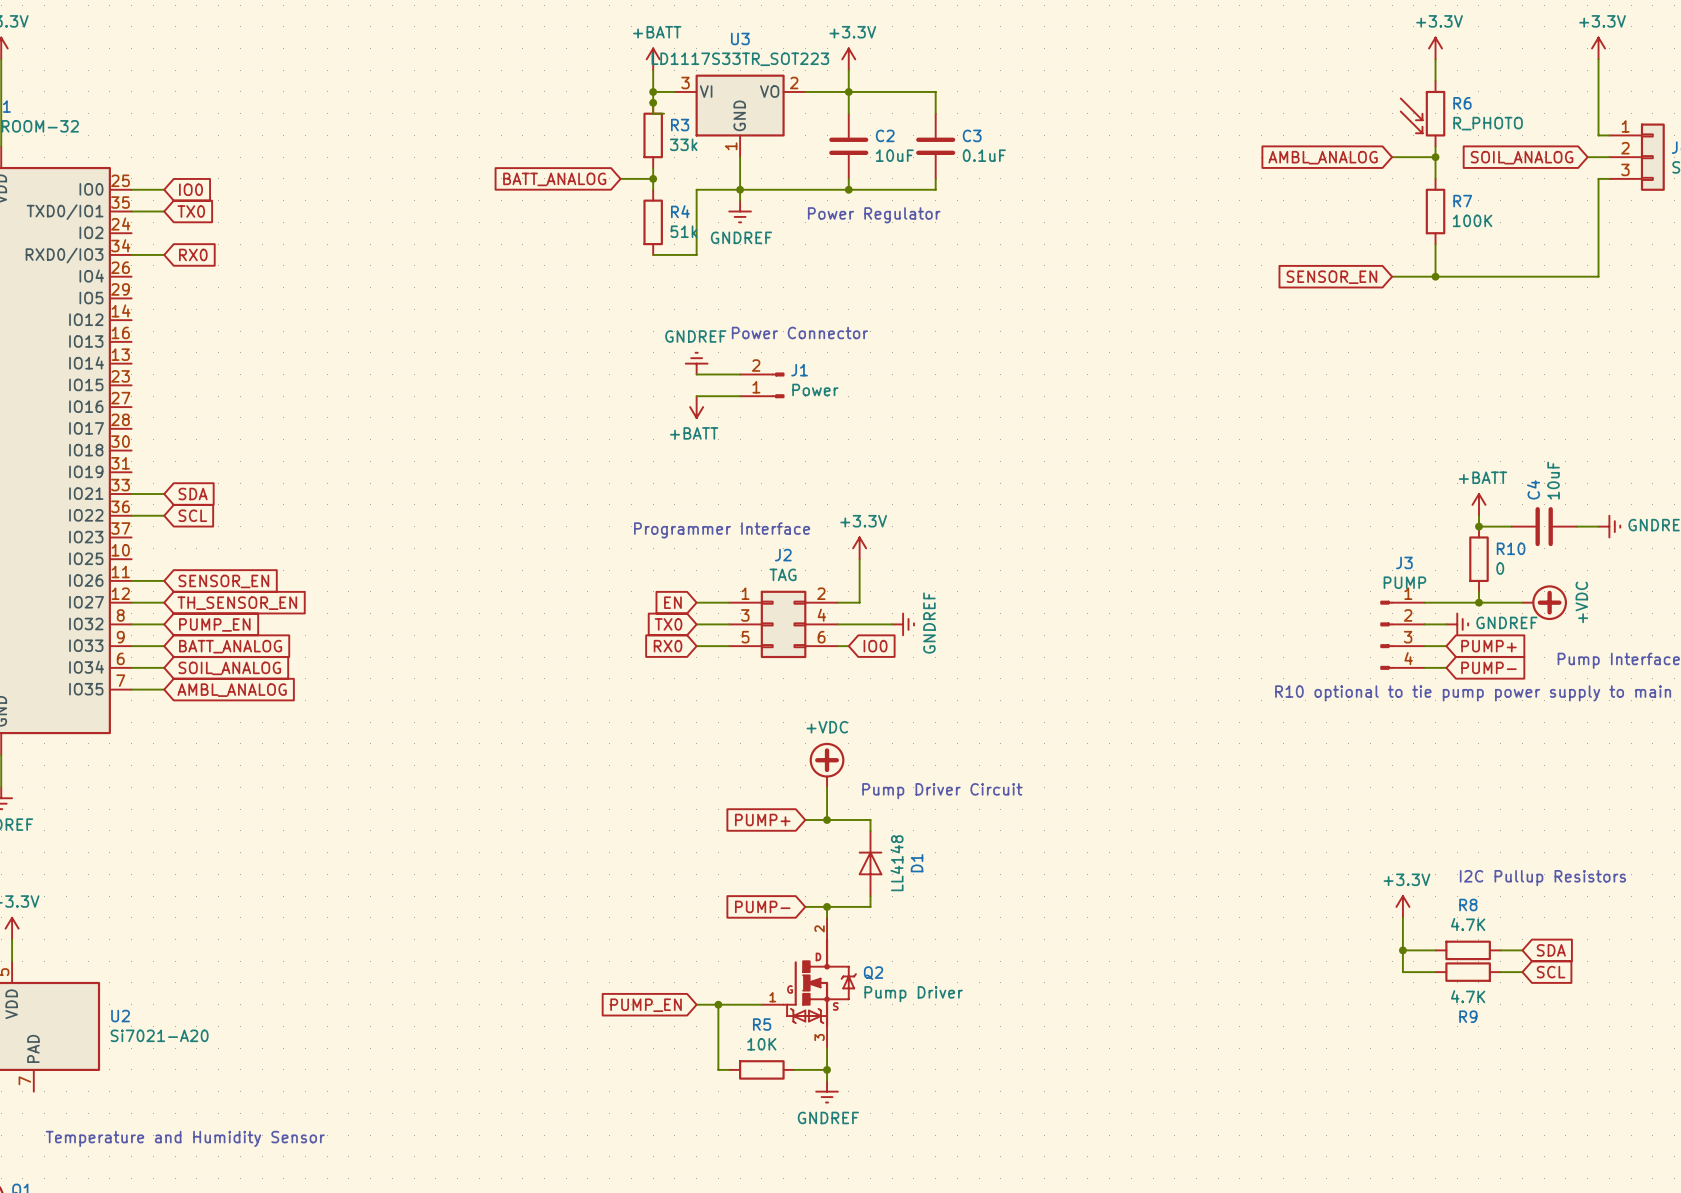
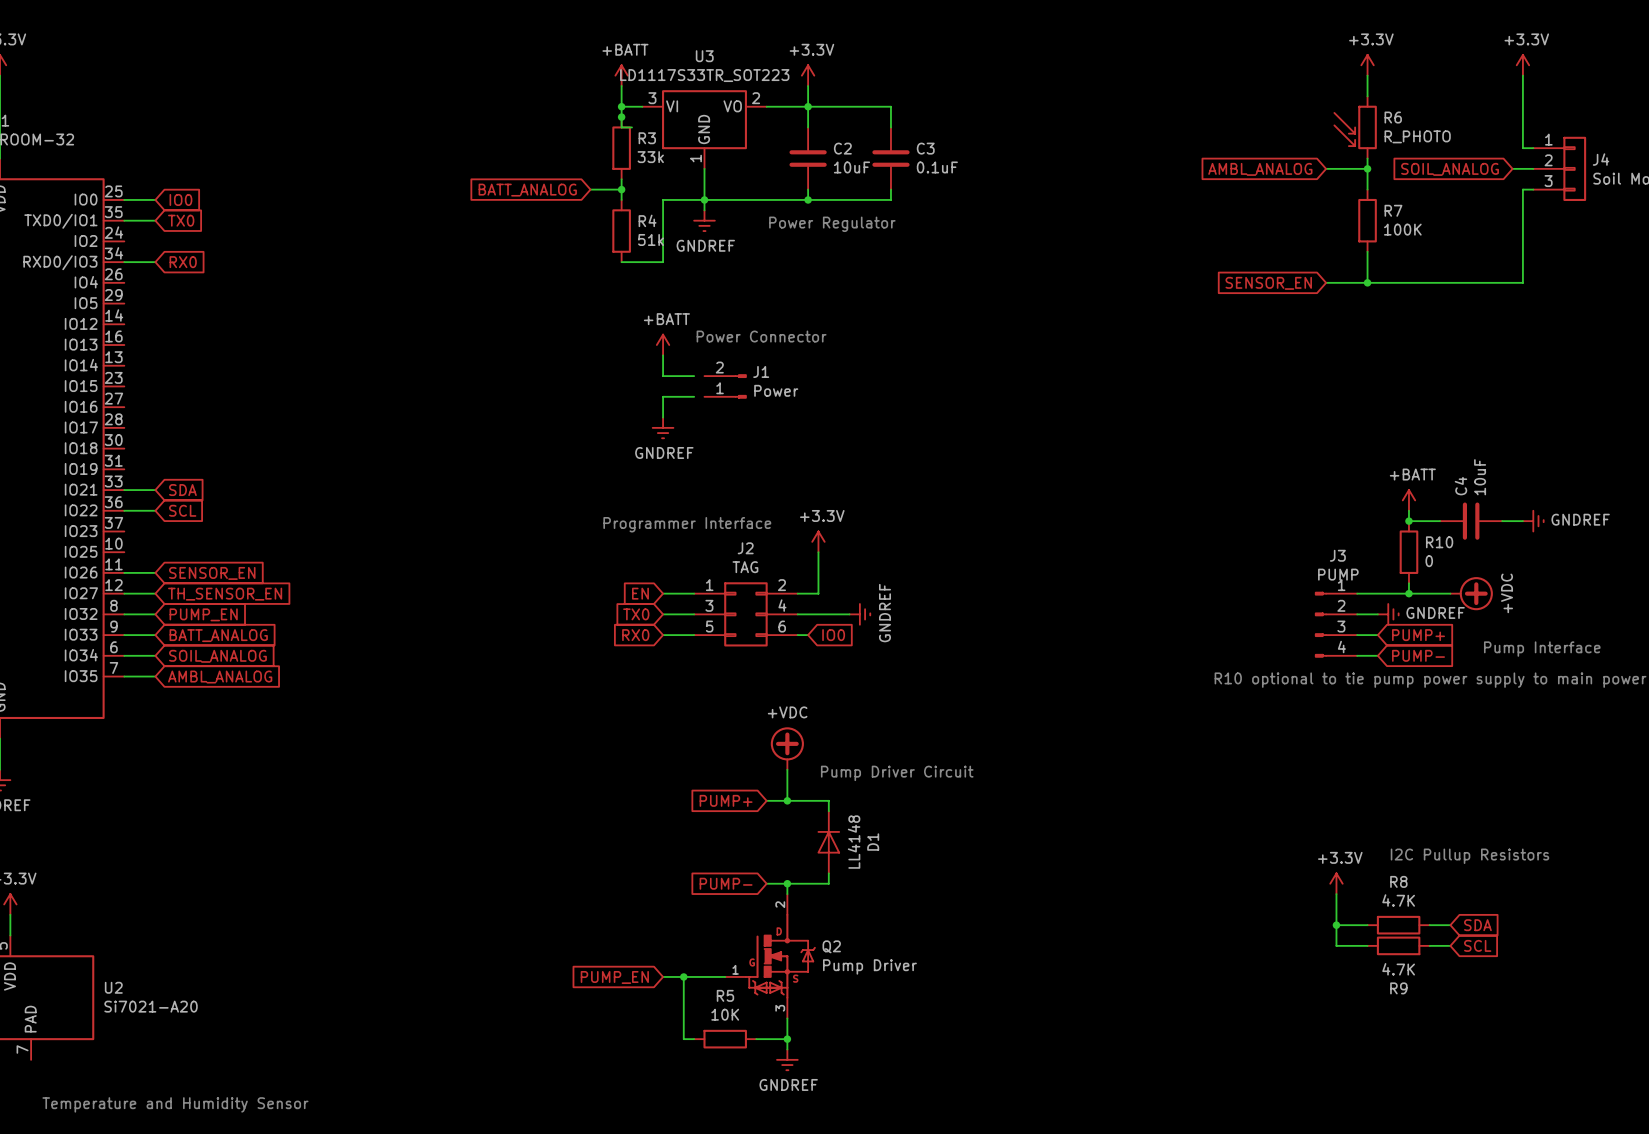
power symbol rotation: 0° (696, 363) -> 180° (663, 427)
power symbol position: GNDREF (696, 363) -> GNDREF (663, 427)
wire: (729, 374) (740, 374) -> none
wire: (729, 396) (740, 396) -> none
power symbol rotation: 0° (696, 407) -> 180° (663, 345)
power symbol position: +BATT (696, 407) -> +BATT (663, 345)

